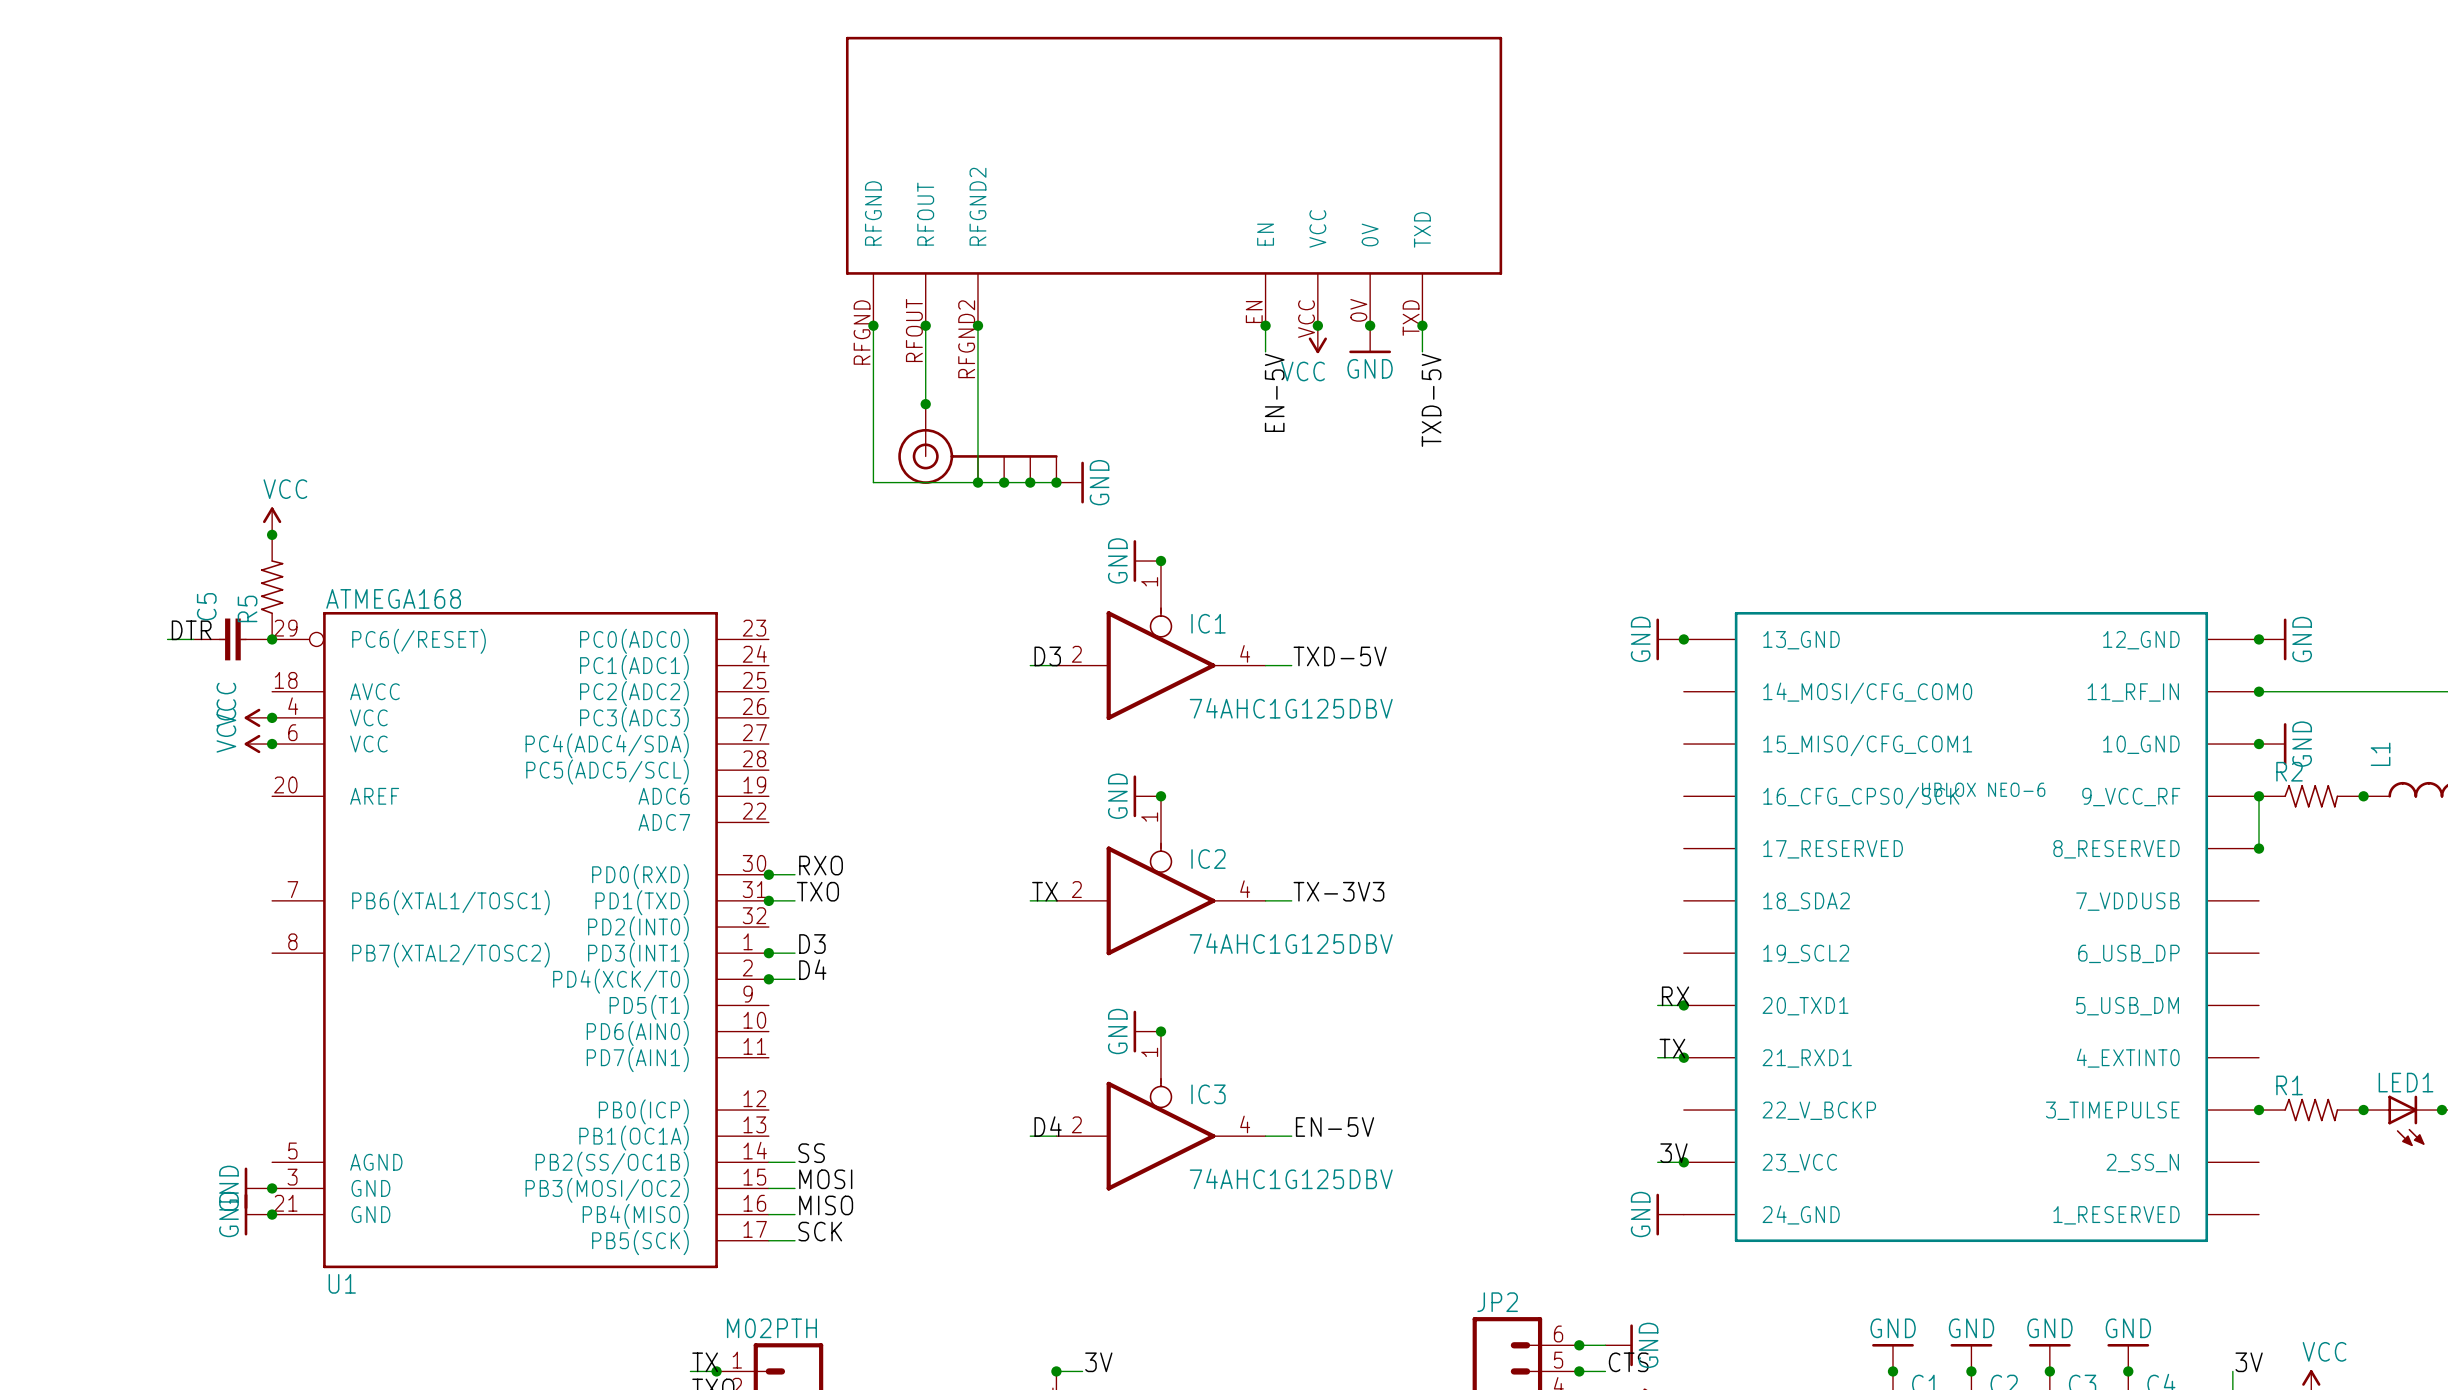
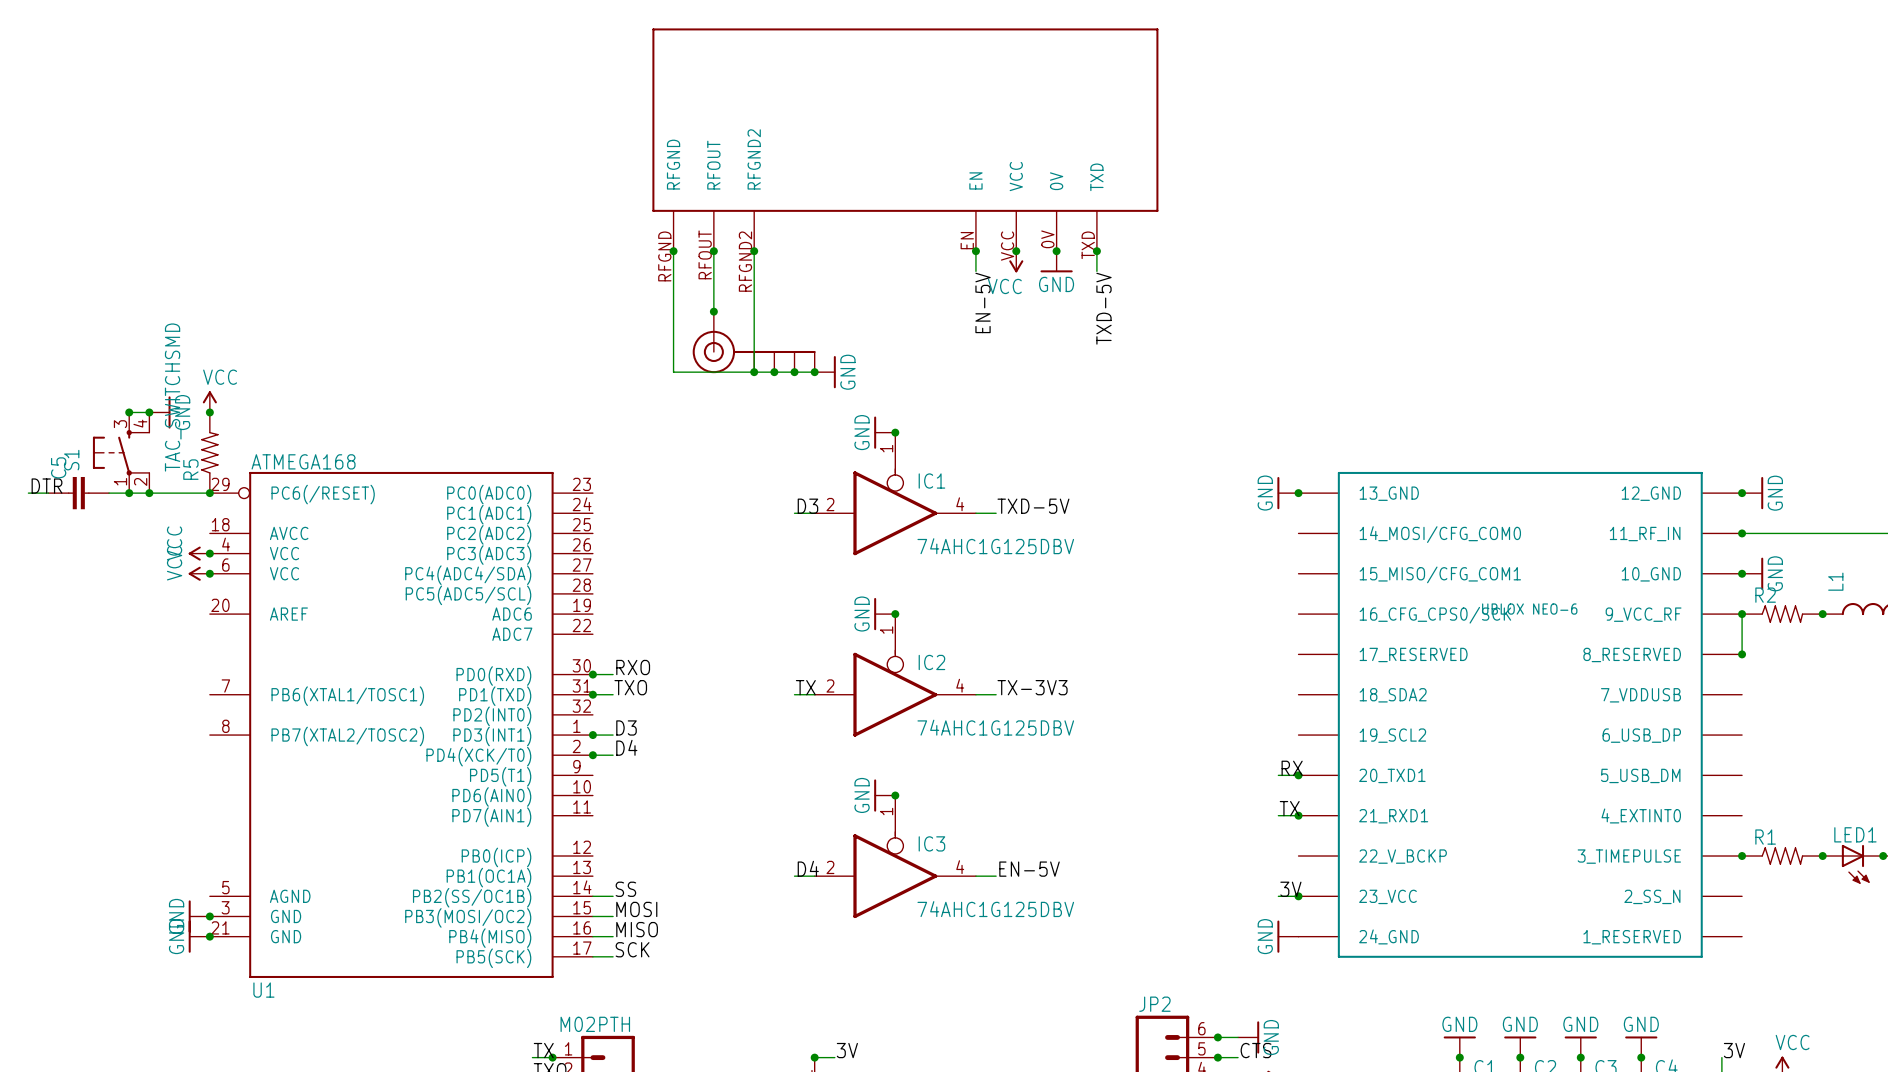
wire: none -> (129, 412) (149, 412)
junction: none -> (129, 412)
junction: none -> (149, 412)
power symbol: none -> GND (159, 412)
S1: none -> TAC_SWITCHSMD (121, 452)
label position: DTR (191, 630) -> DTR (47, 486)
wire: none -> (28, 493) (48, 493)
wire: none -> (109, 493) (129, 493)
junction: none -> (129, 493)
junction: none -> (149, 493)
C5 position: (232, 639) -> (78, 493)

